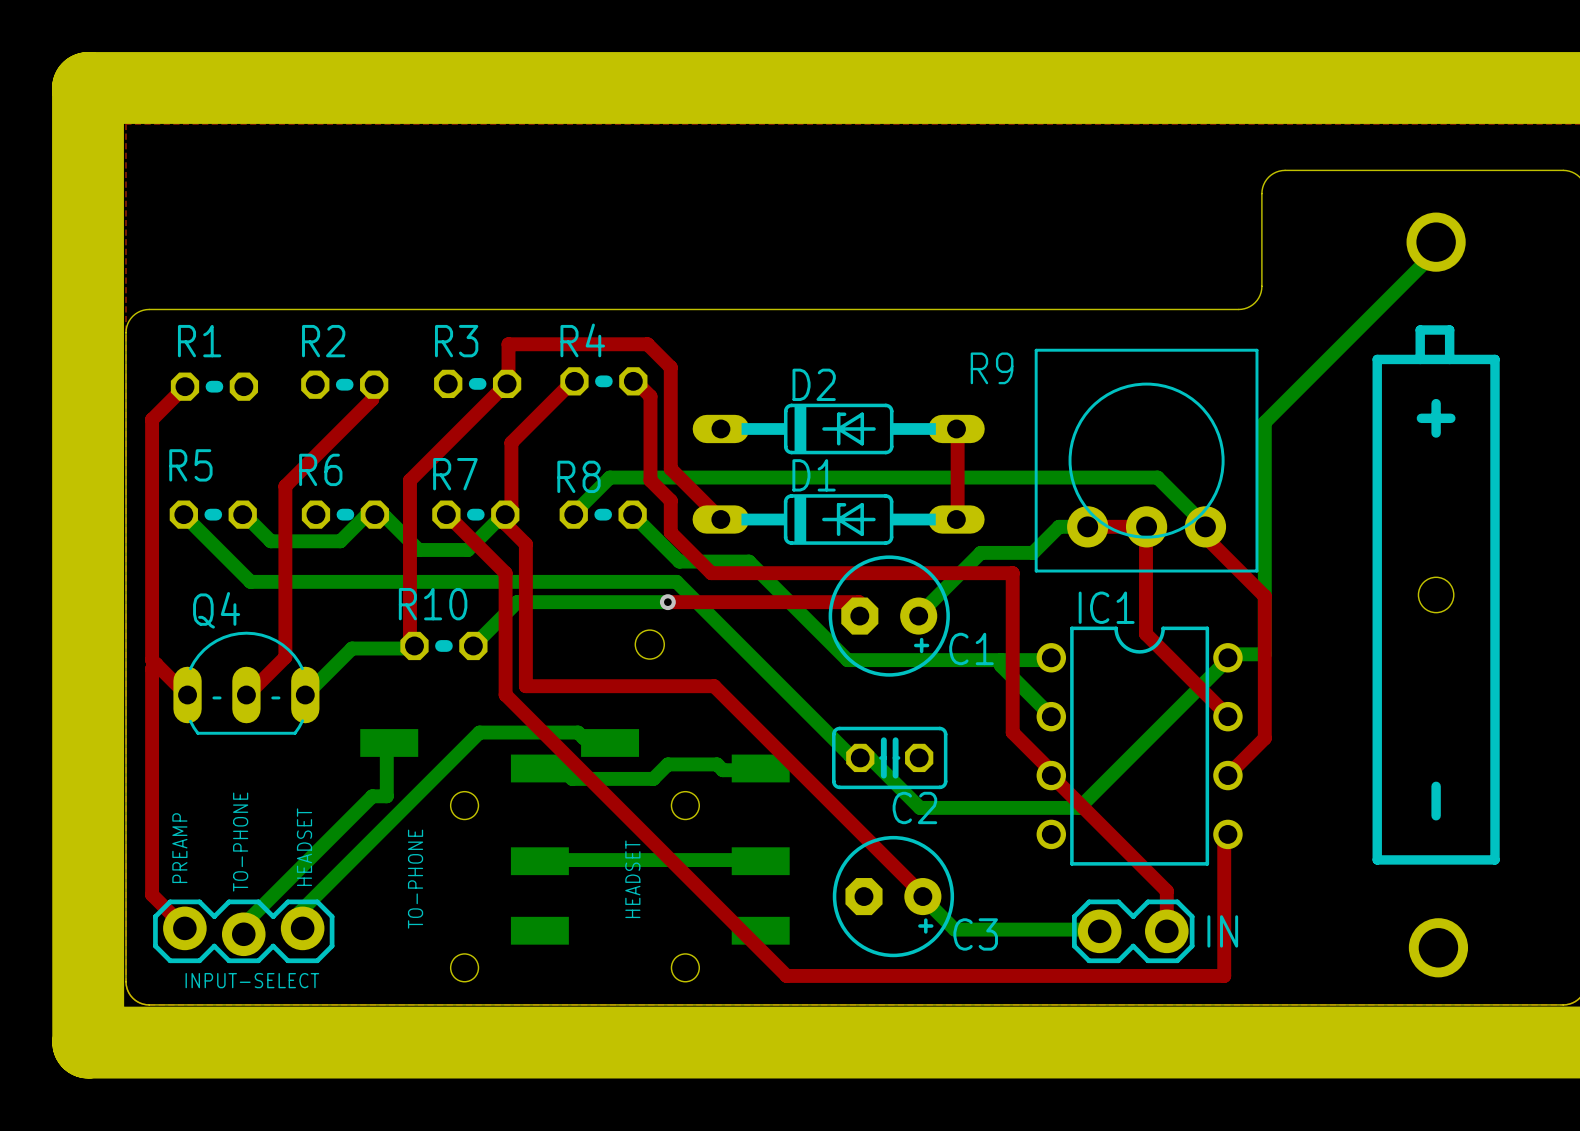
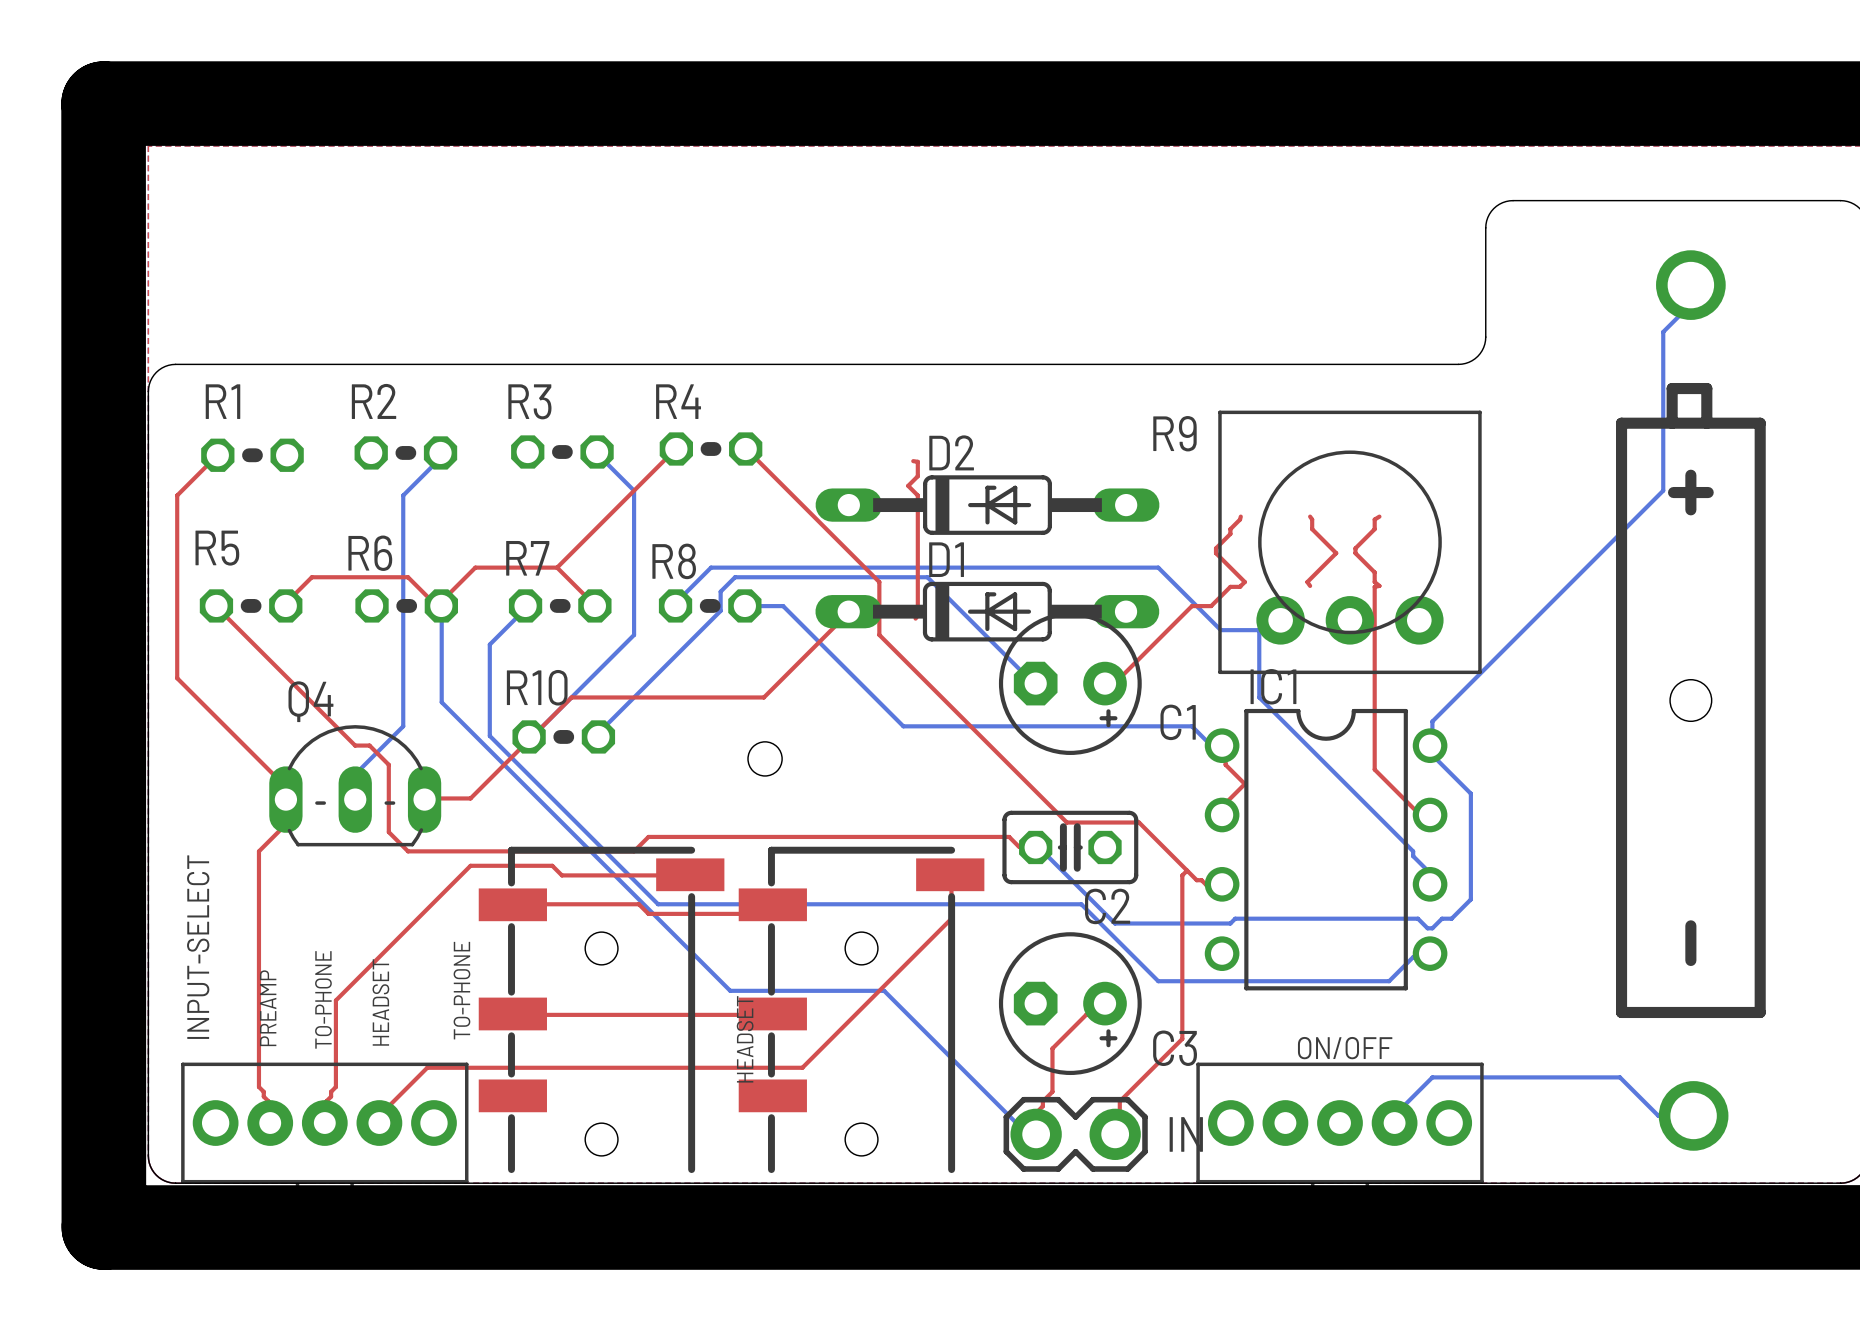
bottom track: (1436, 242) (1435, 263) (1424, 263) (1264, 422) (1264, 654) (1232, 654) (1227, 657) (1079, 807) (919, 807) (870, 758) (850, 755) (676, 581) (250, 581) (183, 514) -> (1690, 285) (1687, 288) (1687, 307) (1663, 331) (1663, 490) (1432, 721) (1432, 745) (1430, 745) (1432, 755) (1470, 793) (1470, 899) (1451, 918) (1442, 918) (1432, 928) (1427, 928) (1417, 918) (1235, 918) (1230, 923) (1115, 923) (1038, 846) (1035, 847)
top track: (574, 381) (511, 442) (511, 506) (505, 512) (505, 523) (525, 544) (525, 686) (714, 686) (922, 896) -> (676, 448) (557, 567)
top track: (633, 381) (650, 396) (650, 480) (670, 500) (670, 532) (711, 573) (1012, 573) (1012, 732) (1050, 770) (1051, 775) (1166, 891) (1166, 931) -> (745, 448) (879, 582) (879, 634) (1066, 822) (1139, 822) (1196, 880) (1201, 880) (1206, 885) (1222, 884)
bottom track: none -> (597, 452) (600, 452) (600, 457) (634, 490) (634, 634) (533, 735) (529, 736)
top track: (374, 384) (372, 384) (372, 399) (285, 486) (285, 657) (246, 694) -> none
bottom track: none -> (440, 452) (441, 457) (403, 495) (403, 726) (359, 769) (359, 798) (355, 799)
top track: (185, 386) (152, 419) (152, 660) (187, 694) -> (217, 455) (177, 495) (177, 678) (283, 784) (283, 798) (285, 799) (283, 803) (283, 827) (258, 851) (258, 1087) (268, 1101) (270, 1123)
top track: none -> (913, 461) (917, 461) (917, 476) (908, 485) (917, 495) (917, 615) (915, 618)
top track: (956, 428) (956, 519) -> none
top track: none -> (1240, 516) (1230, 529) (1230, 533) (1215, 548) (1215, 553) (1244, 582) (1240, 586) (1230, 586) (1211, 606) (1191, 606) (1115, 683) (1105, 683)
top track: none -> (1310, 516) (1312, 519) (1312, 529) (1336, 553) (1307, 582) (1310, 585)
top track: none -> (1379, 516) (1374, 519) (1374, 529) (1355, 548) (1355, 553) (1374, 572) (1374, 582) (1379, 585) (1374, 586) (1374, 769) (1417, 812) (1427, 812) (1430, 815)
top track: none -> (557, 567) (594, 605)
top track: none -> (557, 567) (475, 567) (441, 601) (441, 605) (436, 606) (408, 577) (311, 577) (287, 601) (285, 605)
top track: none -> (216, 605) (220, 606) (220, 610) (355, 745) (369, 745) (388, 764) (388, 832) (408, 851) (634, 851) (648, 836) (1009, 836) (1018, 846) (1035, 847)
bottom track: (242, 514) (270, 541) (340, 541) (366, 515) (383, 515) (418, 549) (467, 549) (505, 514) -> none
bottom track: none -> (441, 606) (441, 702) (730, 990) (884, 990) (1023, 1130) (1033, 1130) (1036, 1134)
top track: (446, 514) (505, 573) (505, 694) (786, 975) (1224, 975) (1224, 839) (1227, 834) -> none
bottom track: none -> (525, 605) (523, 606) (523, 610) (489, 644) (489, 735) (658, 904) (1081, 904) (1158, 981) (1389, 981) (1413, 957) (1427, 957) (1430, 953)
bottom track: (573, 514) (609, 477) (1157, 477) (1205, 526) -> (675, 605) (677, 601) (711, 567) (1158, 567) (1220, 630) (1259, 630) (1259, 697) (1413, 851) (1413, 856) (1427, 870) (1427, 880) (1430, 884)
bottom track: (632, 514) (679, 561) (749, 561) (847, 660) (1050, 660) (1051, 657) -> (744, 605) (783, 606) (903, 726) (1191, 726) (1211, 745) (1222, 745)
top track: (720, 519) (670, 468) (670, 367) (647, 344) (508, 344) (507, 383) (409, 480) (409, 636) (414, 645) -> none
top track: none -> (846, 618) (845, 620) (840, 620) (763, 697) (571, 697) (533, 735) (529, 736) (528, 740) (470, 798) (424, 799)
bottom track: (1087, 526) (1059, 526) (1032, 552) (980, 552) (918, 616) -> none
top track: (1088, 526) (1146, 526) (1145, 634) (1227, 716) -> none
top track: (1205, 526) (1206, 538) (1264, 596) (1264, 738) (1227, 775) -> none
bottom track: none -> (1035, 683) (927, 577) (735, 577) (720, 591) (720, 610) (600, 731) (600, 735) (598, 736)
top track: (667, 602) (859, 602) (859, 616) -> none
bottom track: (667, 602) (517, 602) (473, 645) -> none
via: (667, 602) -> none
C1 position: (889, 616) -> (1070, 683)
top track: none -> (1222, 745) (1225, 750) (1225, 764) (1244, 784) (1225, 803) (1225, 812) (1222, 815)
bottom track: (414, 645) (412, 648) (352, 648) (305, 694) -> none
R10 position: (443, 645) -> (563, 736)
bottom track: (1001, 660) (1001, 665) (1051, 716) -> none
top track: (156, 664) (152, 668) (152, 894) (184, 928) -> none
Q4 position: (246, 683) -> (355, 785)
top track: none -> (1187, 870) (1182, 875) (1182, 1038) (1119, 1101) (1119, 1130) (1115, 1134)
bottom track: (389, 742) (386, 744) (386, 796) (372, 796) (244, 923) (243, 934) -> none
top track: none -> (690, 874) (561, 875) (552, 865) (470, 865) (335, 1000) (335, 1087) (326, 1101) (324, 1123)
bottom track: (610, 742) (607, 738) (583, 738) (578, 732) (479, 732) (299, 912) (299, 926) (302, 928) -> none
top track: none -> (950, 874) (951, 918) (802, 1067) (427, 1067) (384, 1111) (384, 1120) (379, 1123)
IC1 position: (1139, 746) -> (1326, 849)
C2 position: (889, 757) -> (1070, 847)
top track: none -> (512, 904) (638, 904) (648, 913) (763, 913) (772, 904)
bottom track: (539, 768) (543, 773) (566, 773) (572, 778) (653, 778) (667, 764) (717, 764) (722, 770) (760, 770) (760, 768) -> none
text position: TO-PHONE (240, 842) -> TO-PHONE (323, 999)
text position: HEADSET (304, 847) -> HEADSET (380, 1002)
text position: PREAMP (179, 848) -> PREAMP (268, 1008)
top track: none -> (1105, 1003) (1090, 1014) (1086, 1014) (1052, 1048) (1052, 1091) (1042, 1101) (1042, 1106) (1038, 1111) (1038, 1130) (1036, 1134)
part side: bottom (464, 855) -> top (601, 1009)
part side: bottom (685, 855) -> top (861, 1009)
top track: none -> (512, 1013) (772, 1013)
bottom track: (539, 861) (760, 861) -> none
text position: TO-PHONE (415, 879) -> TO-PHONE (461, 990)
text: none -> ON/OFF (1345, 1048)
C3 position: (893, 896) -> (1070, 1003)
bottom track: (922, 896) (954, 929) (1099, 929) (1099, 931) -> none
INPUT-SELECT: (243, 931) -> none
IN position: (1133, 931) -> (1075, 1134)
bottom track: none -> (1693, 1115) (1658, 1115) (1619, 1077) (1432, 1077) (1398, 1111) (1398, 1120) (1394, 1123)
INPUT-SELECT: none -> (324, 1163)
part: none -> (1340, 1163)

